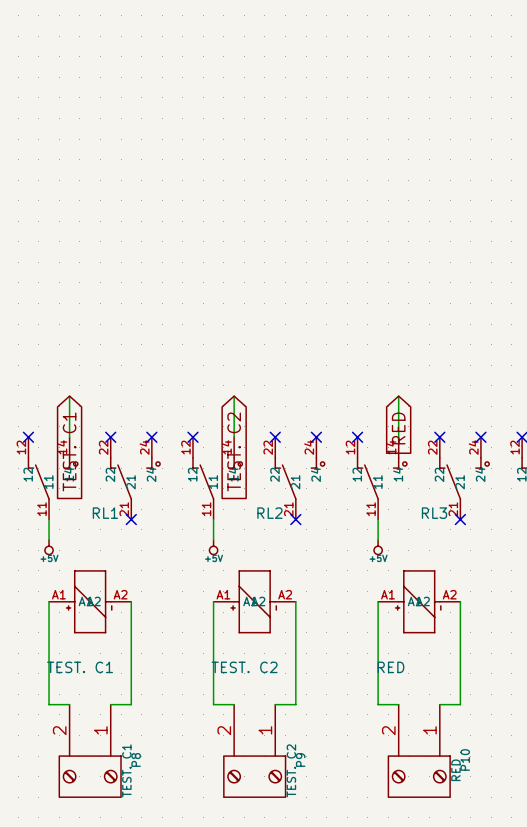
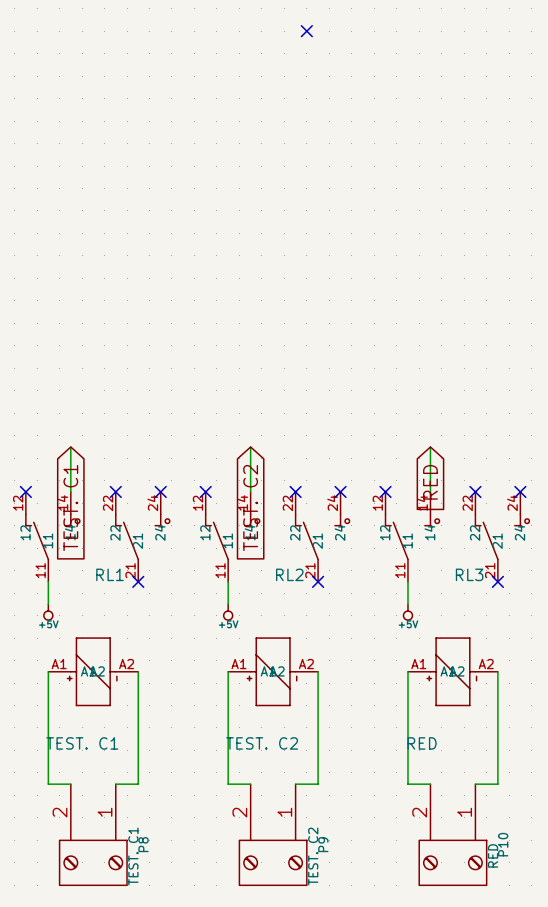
no-connect mark: none -> (306, 31)

